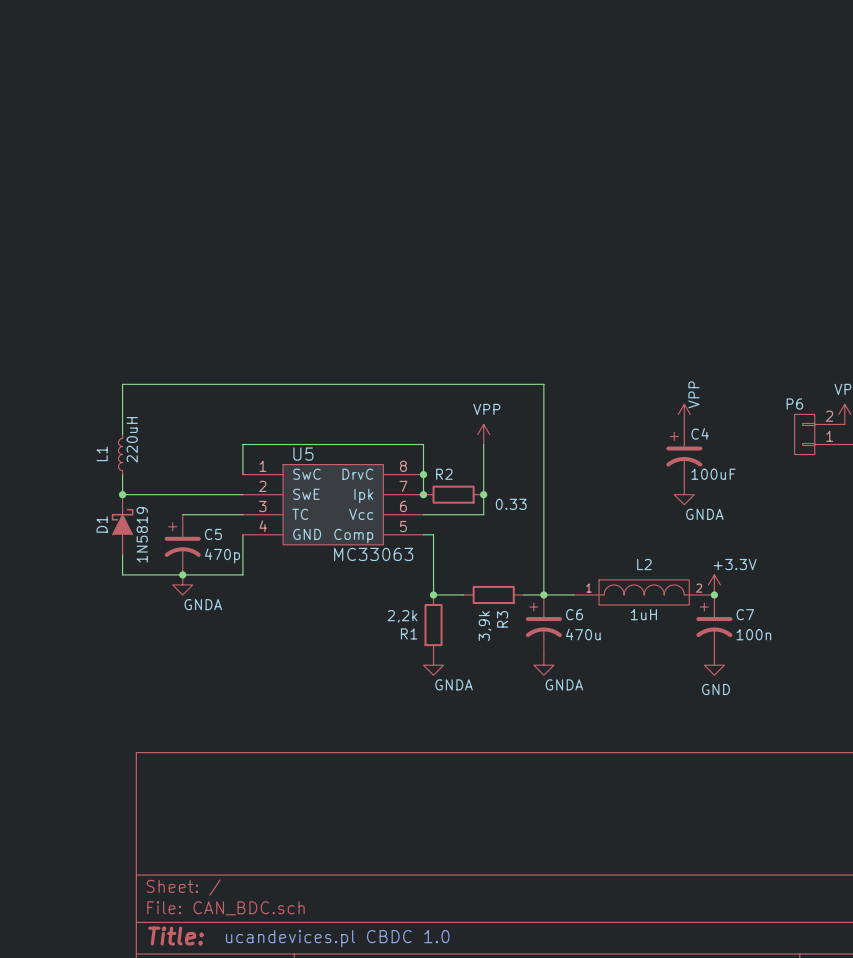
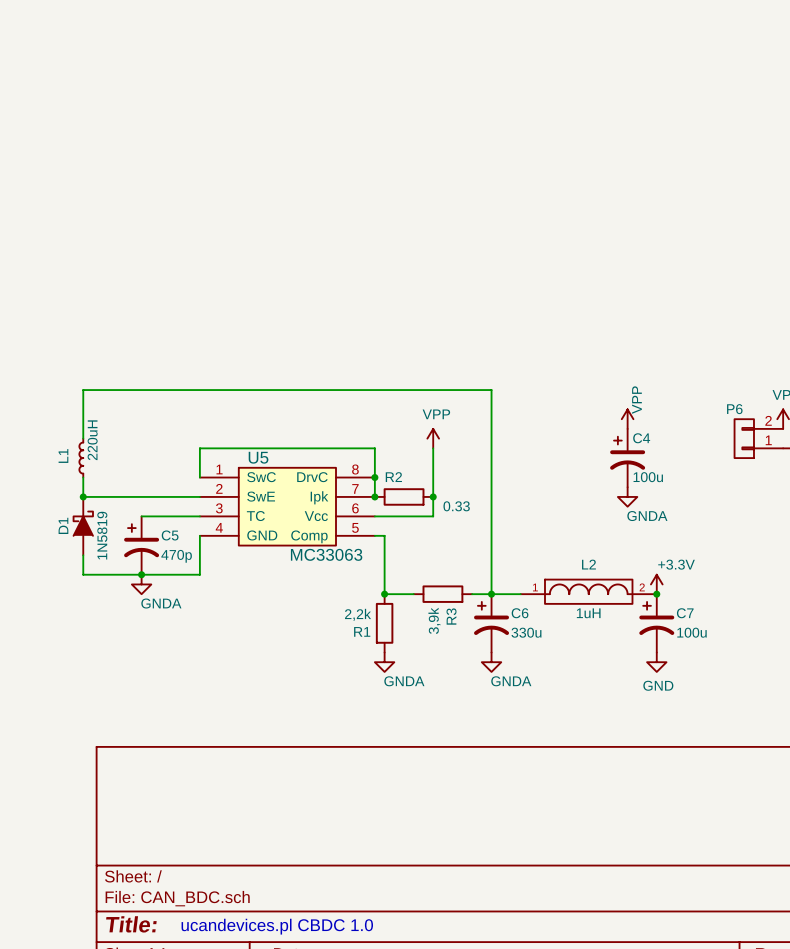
C4 value: 100uF (713, 474) -> 100u (648, 477)
C6 value: 470u (583, 634) -> 330u (526, 632)
C7 value: 100n (753, 634) -> 100u (692, 632)

